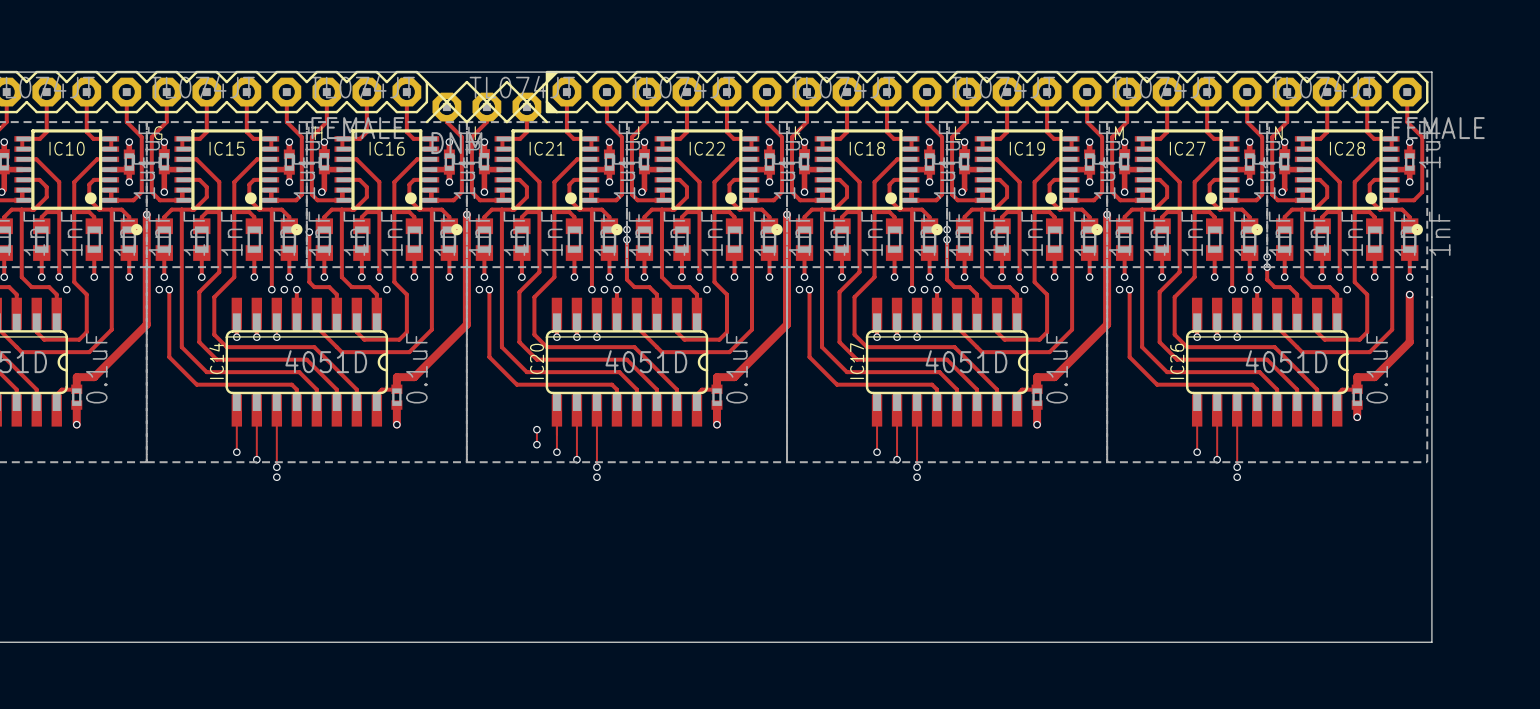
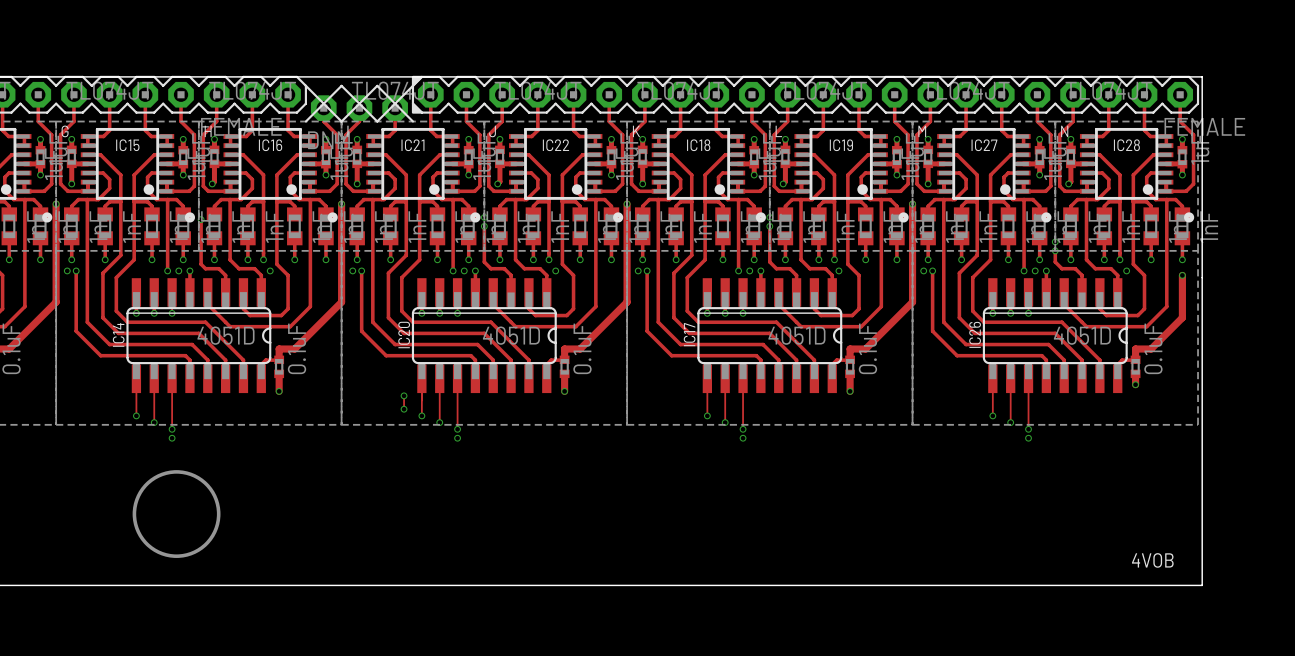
drawing: none -> [132, 470, 221, 558]
text: none -> 4VOB (1152, 560)

